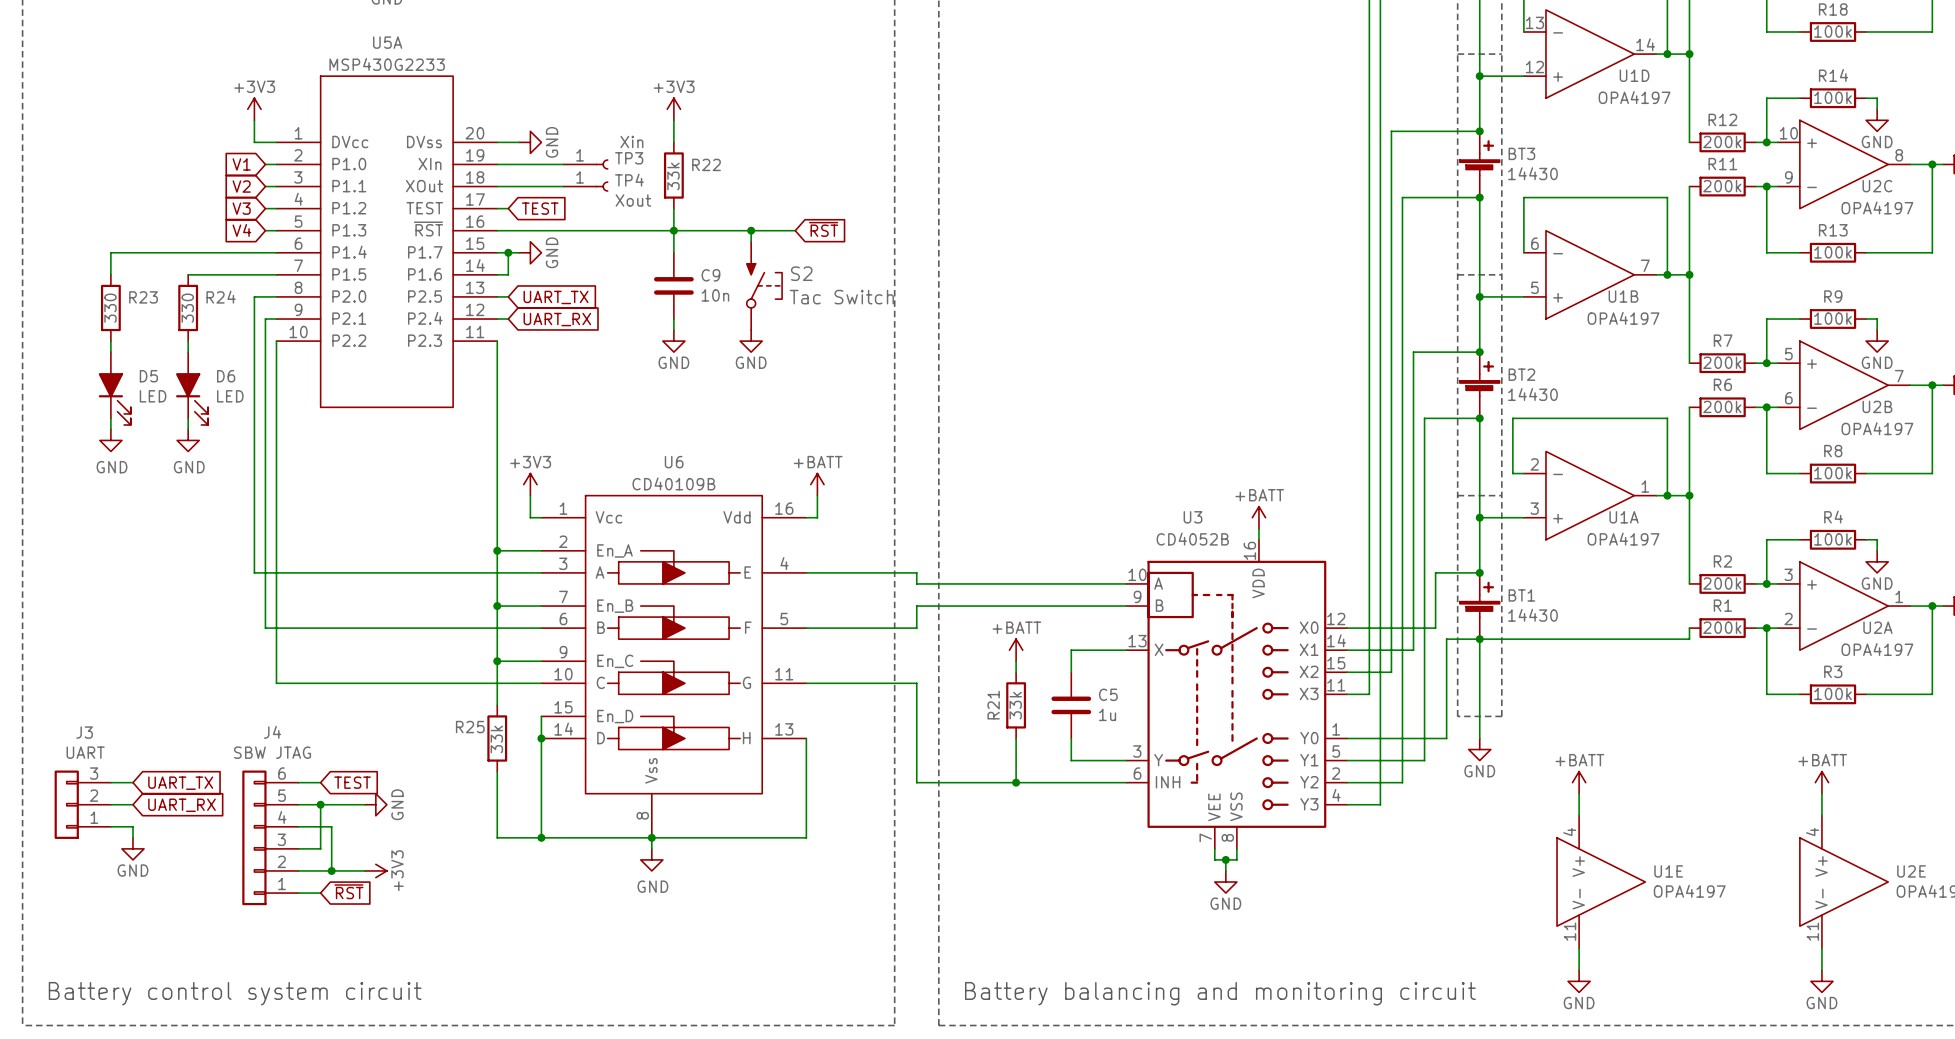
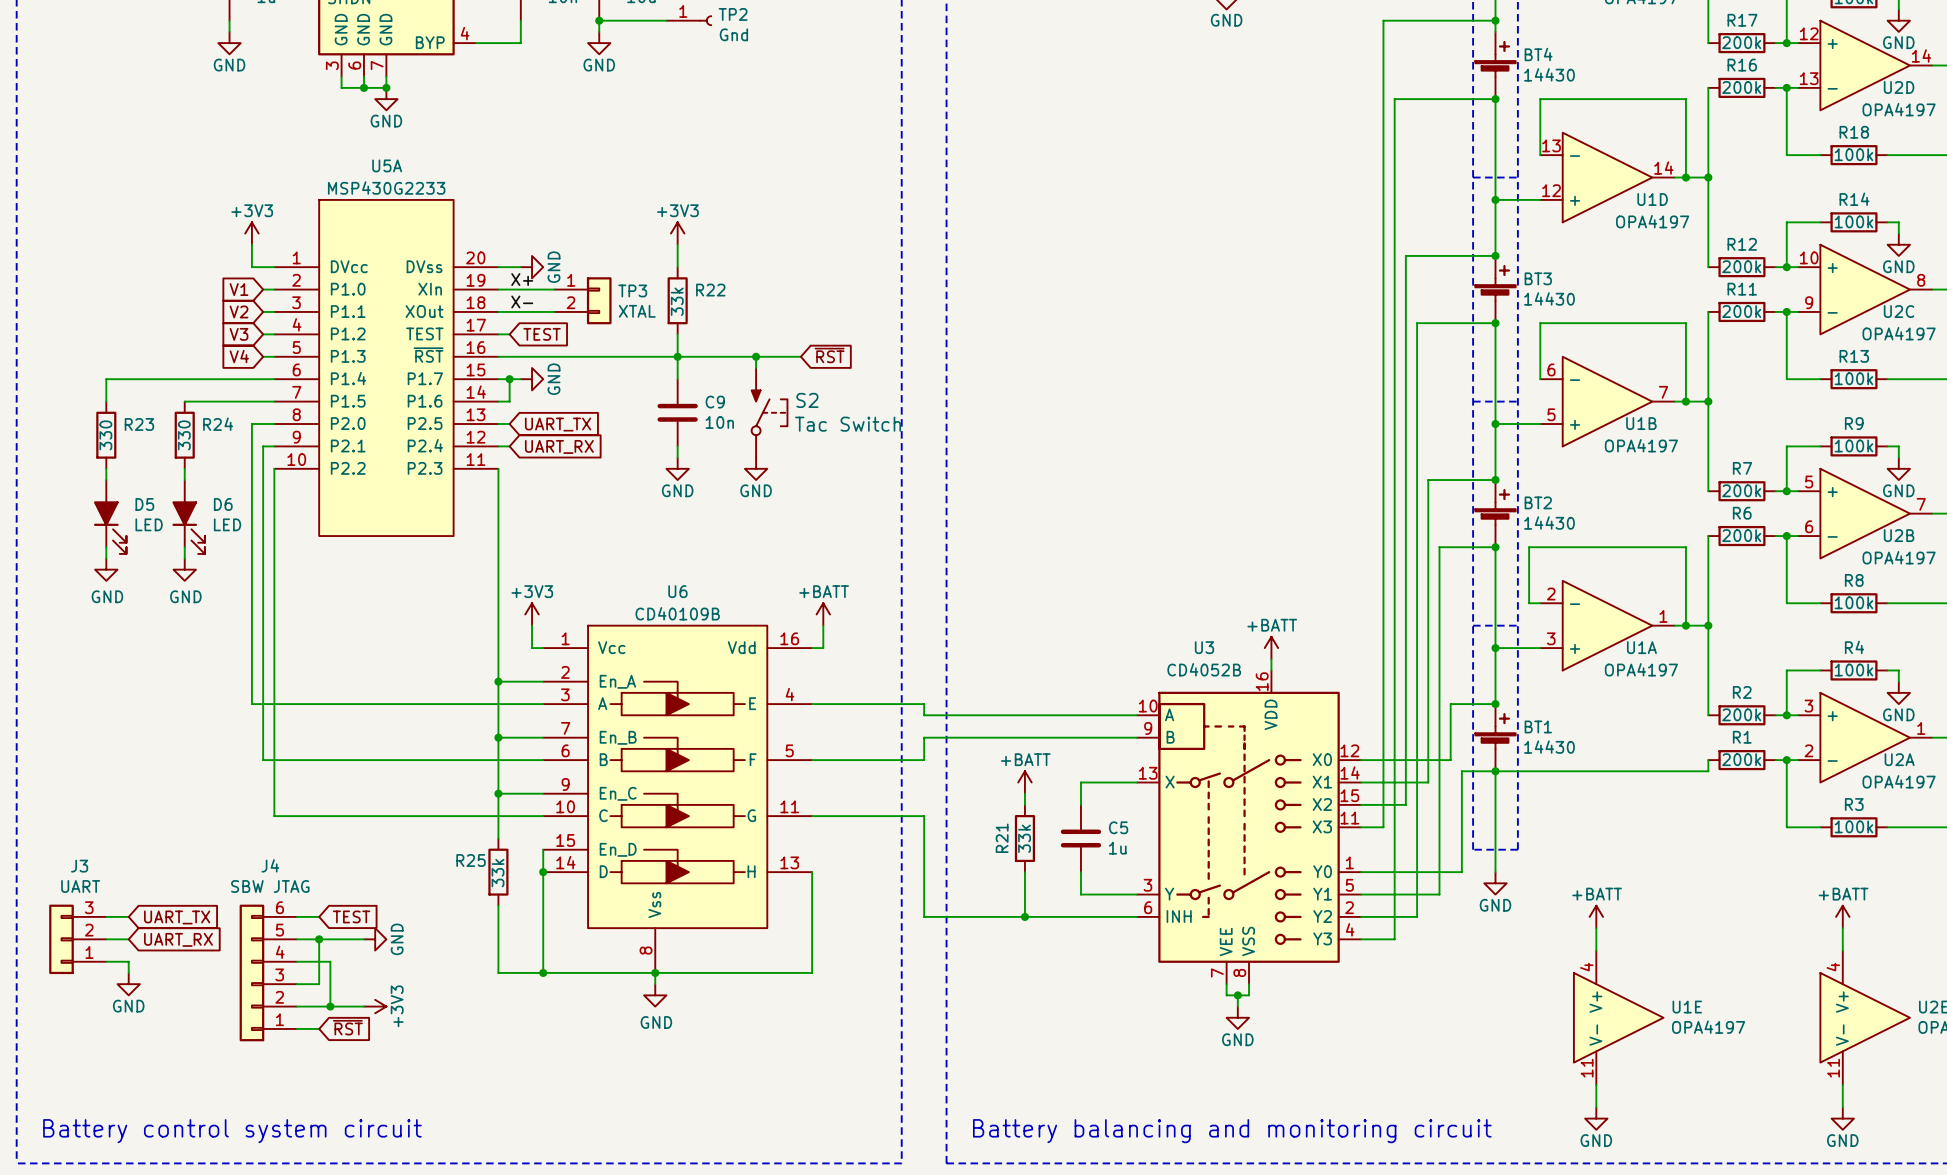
TP3 value: Xin (631, 141) -> XTAL (637, 311)
label: none -> X+ (522, 279)
TP3 symbol: [563, 159, 609, 170] -> [554, 277, 612, 325]
label: none -> X- (522, 301)
TP4: Xout (585, 186) -> none

